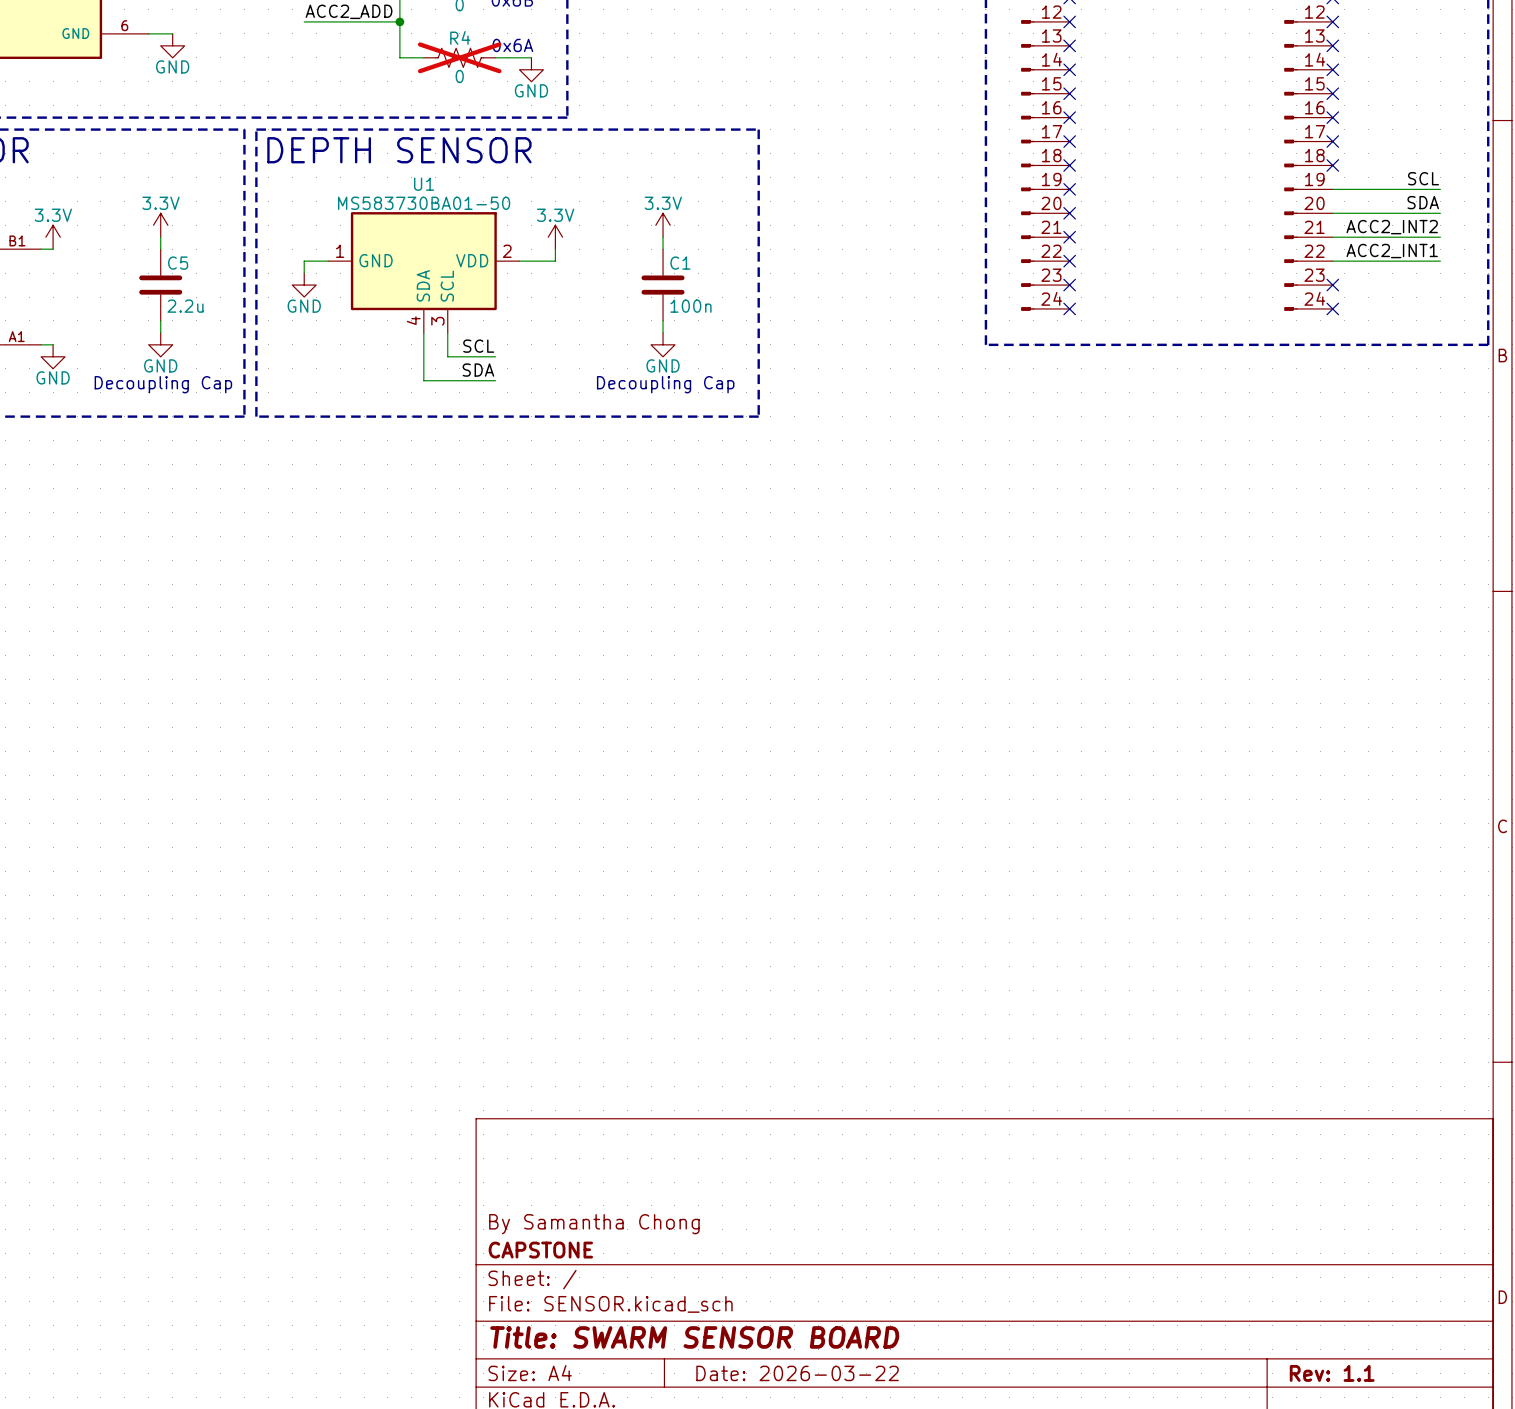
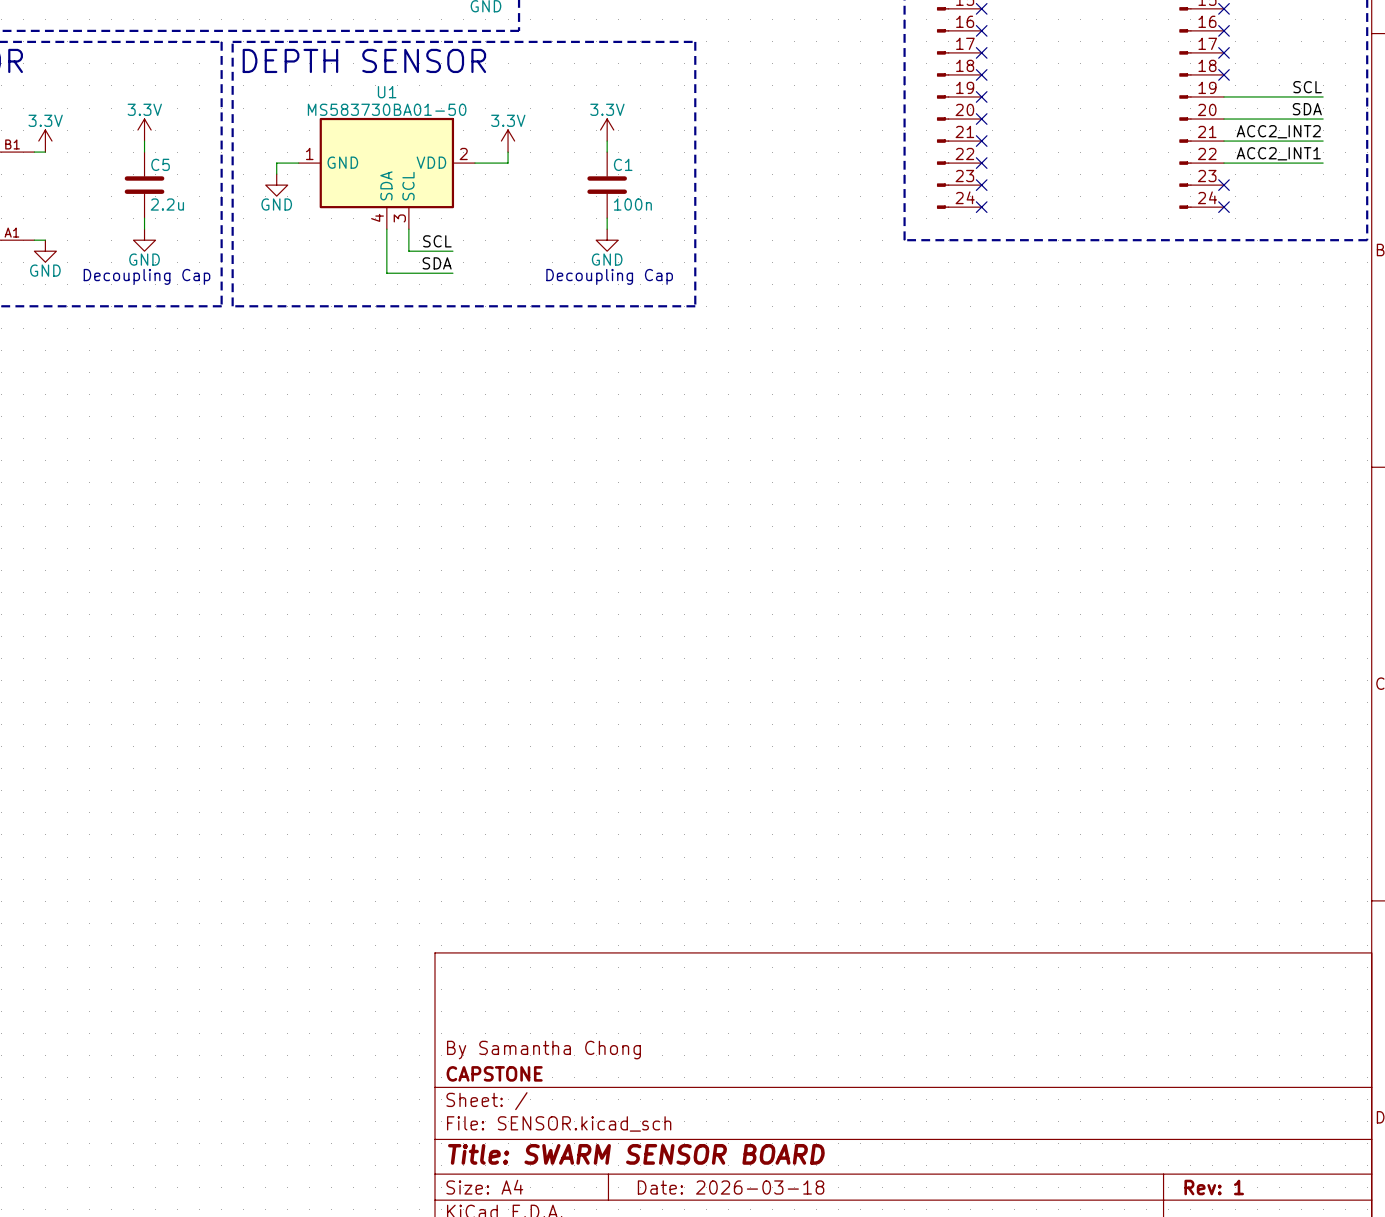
title block: Date: 2026-03-22 (797, 1373) -> Date: 2026-03-18 (731, 1187)
title block: Rev: 1.1 (1332, 1373) -> Rev: 1 (1214, 1187)

